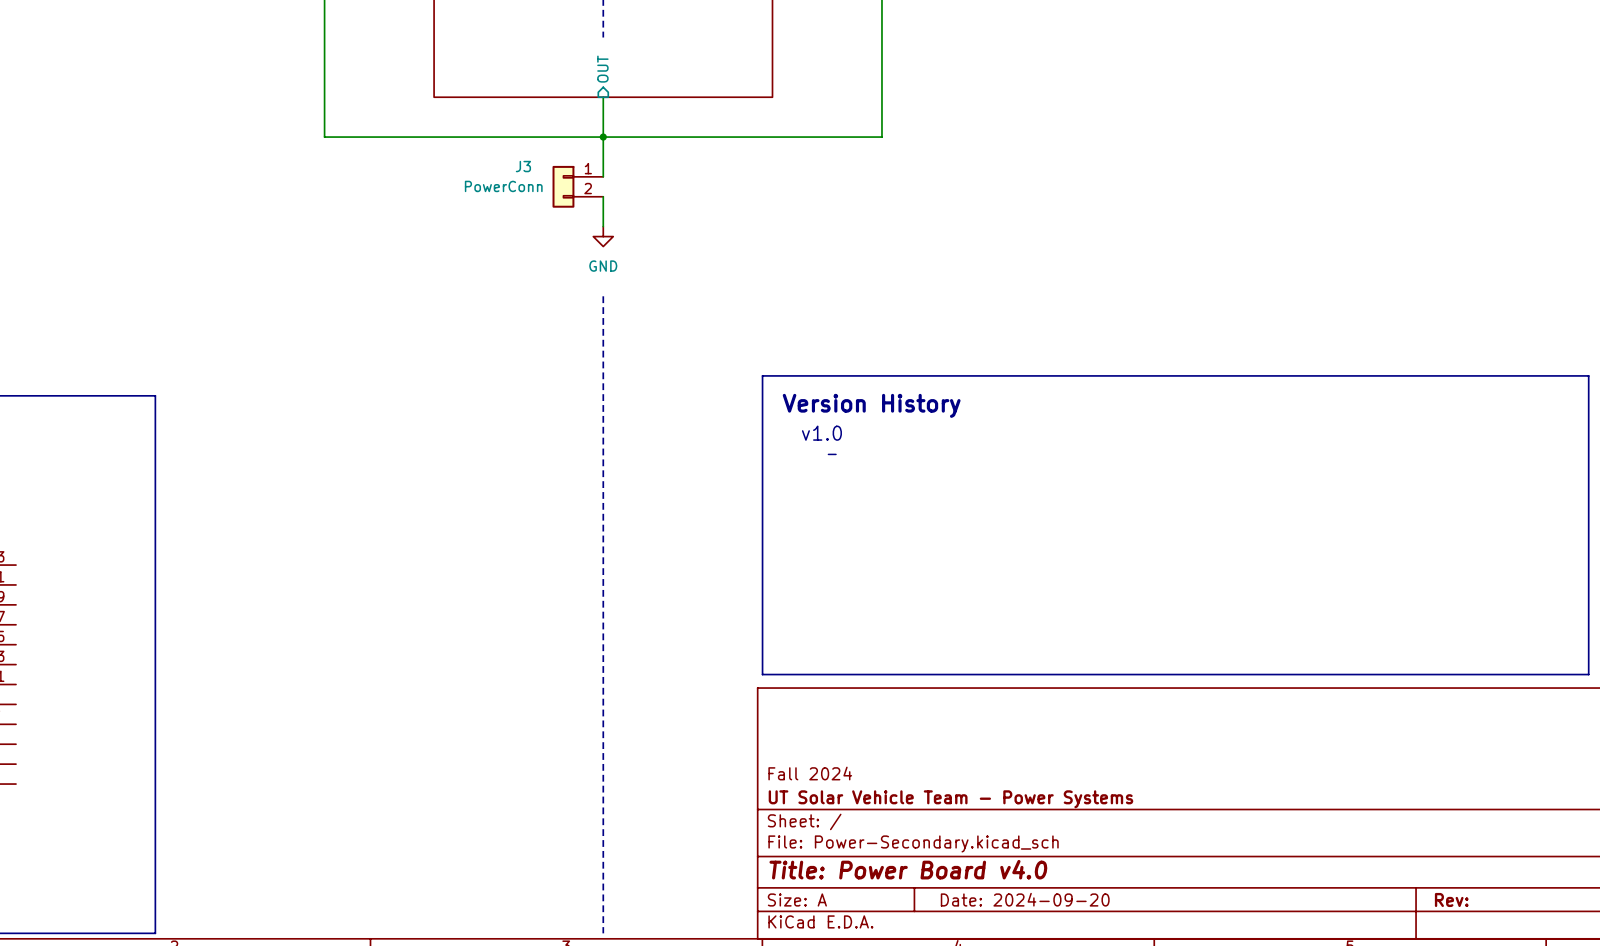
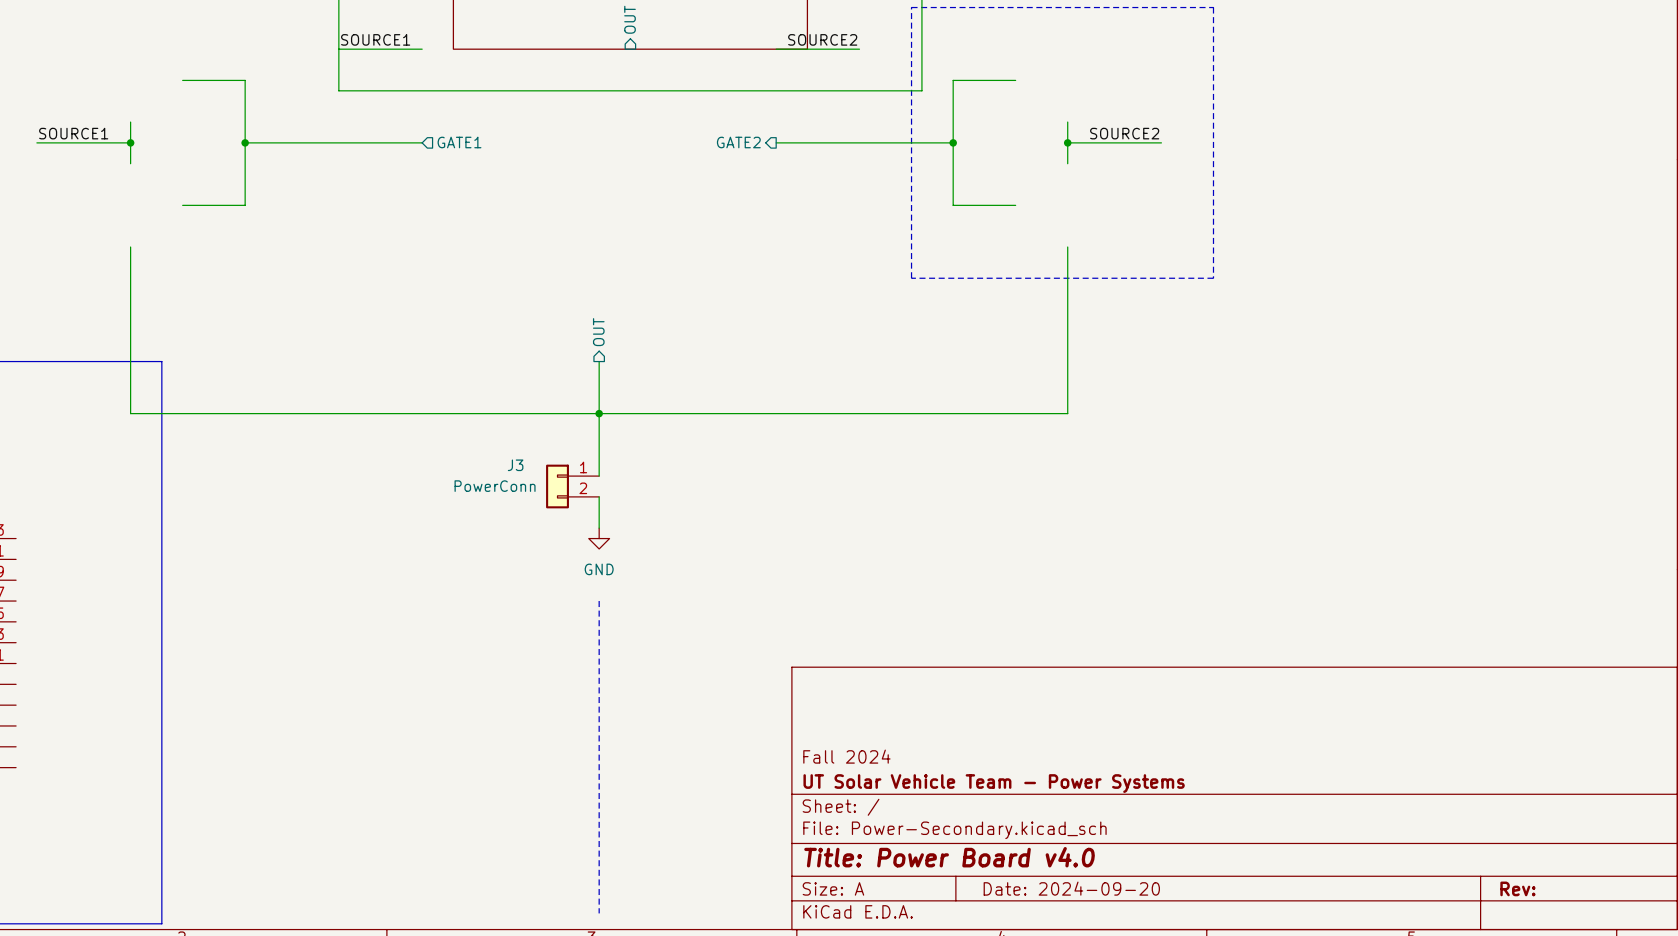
line: none -> (911, 7) (1213, 7) (1213, 278) (911, 278) (911, 7)
label: none -> SOURCE1 (375, 39)
label: none -> SOURCE2 (822, 39)
wire: none -> (338, 49) (422, 49)
wire: (603, 97) (603, 176) -> none
wire: none -> (776, 49) (859, 49)
wire: none -> (182, 80) (245, 80) (245, 205) (182, 205)
wire: none -> (1015, 80) (953, 80) (953, 205) (1015, 205)
junction: (603, 137) -> none
wire: none -> (130, 122) (130, 163)
wire: none -> (1067, 122) (1067, 163)
label: none -> SOURCE1 (73, 133)
label: none -> SOURCE2 (1124, 133)
wire: none -> (36, 142) (130, 142)
junction: none -> (130, 142)
wire: none -> (245, 142) (422, 142)
junction: none -> (245, 142)
sheet pin: none -> GATE1 (459, 142)
J3 position: (577, 186) -> (572, 486)
sheet pin: none -> GATE2 (738, 142)
wire: none -> (776, 142) (953, 142)
junction: none -> (953, 142)
wire: none -> (1067, 142) (1161, 142)
junction: none -> (1067, 142)
wire: (603, 196) (603, 226) -> none
power symbol: GND (603, 236) -> none
wire: none -> (130, 247) (130, 413) (1067, 413) (1067, 247)
line: (603, 296) (603, 933) -> none
sheet pin: none -> OUT (598, 332)
line: (762, 375) (1588, 375) (1588, 674) (762, 674) (762, 375) -> none
wire: none -> (599, 361) (599, 476)
text: Version History (871, 405) -> none
text: v1.0 (821, 433) -> none
junction: none -> (599, 413)
text: - (832, 454) -> none
wire: none -> (599, 496) (599, 528)
power symbol: none -> GND (599, 538)
line: none -> (599, 601) (599, 913)

